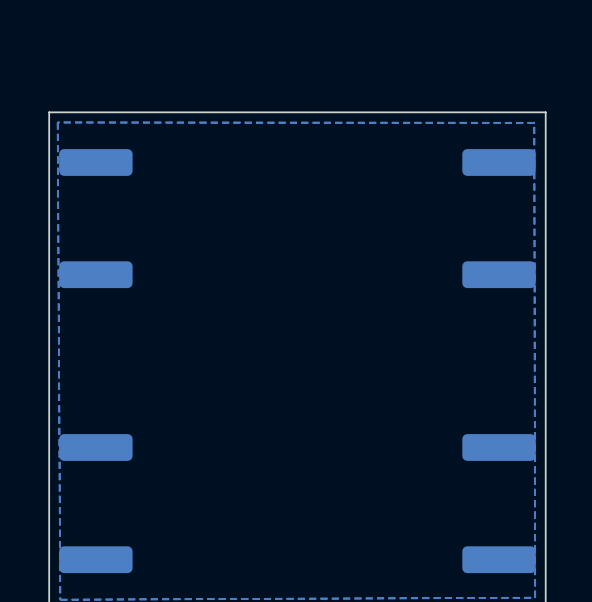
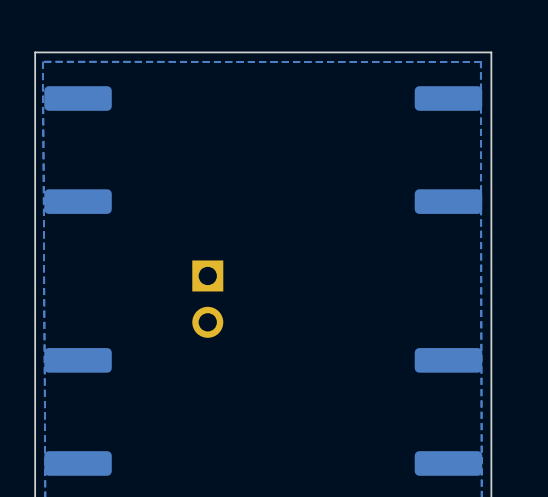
part: none -> (207, 299)

